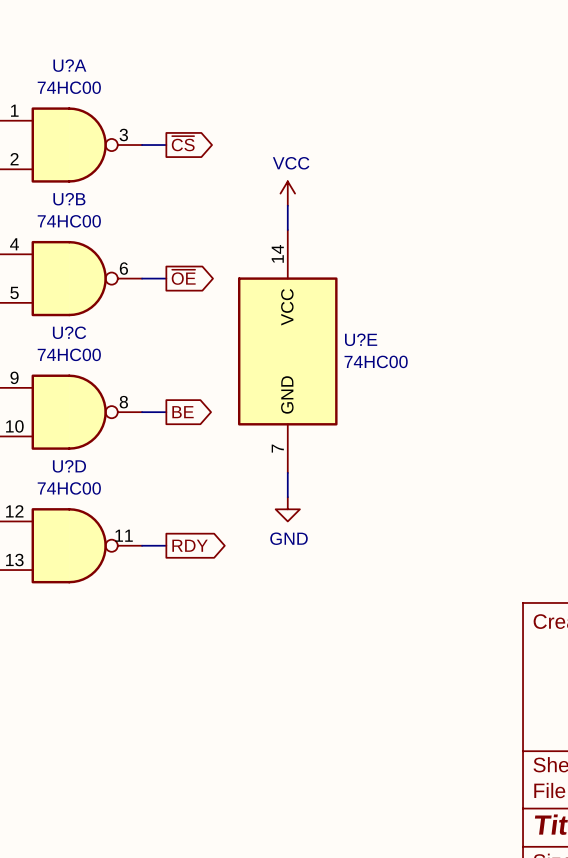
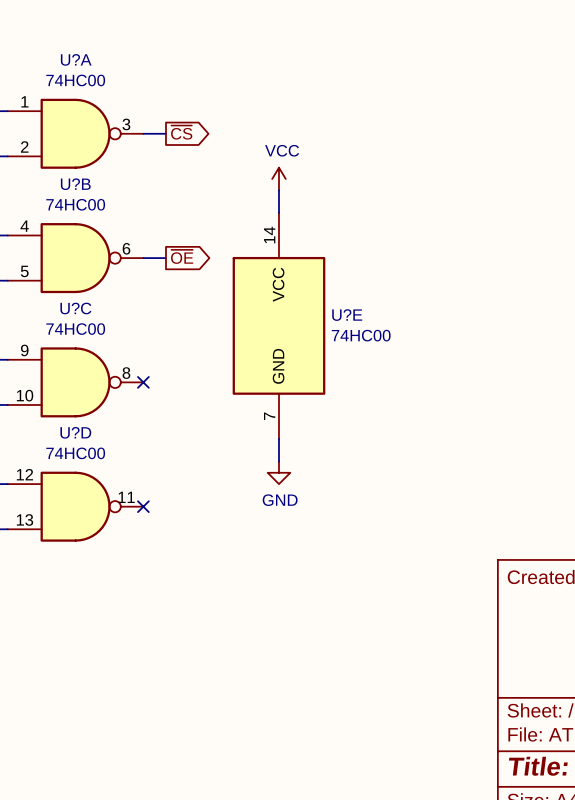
wire: (142, 412) (166, 412) -> none
no-connect mark: none -> (143, 382)
global label: BE (183, 412) -> none
wire: (142, 545) (166, 545) -> none
no-connect mark: none -> (143, 506)
global label: RDY (190, 545) -> none

